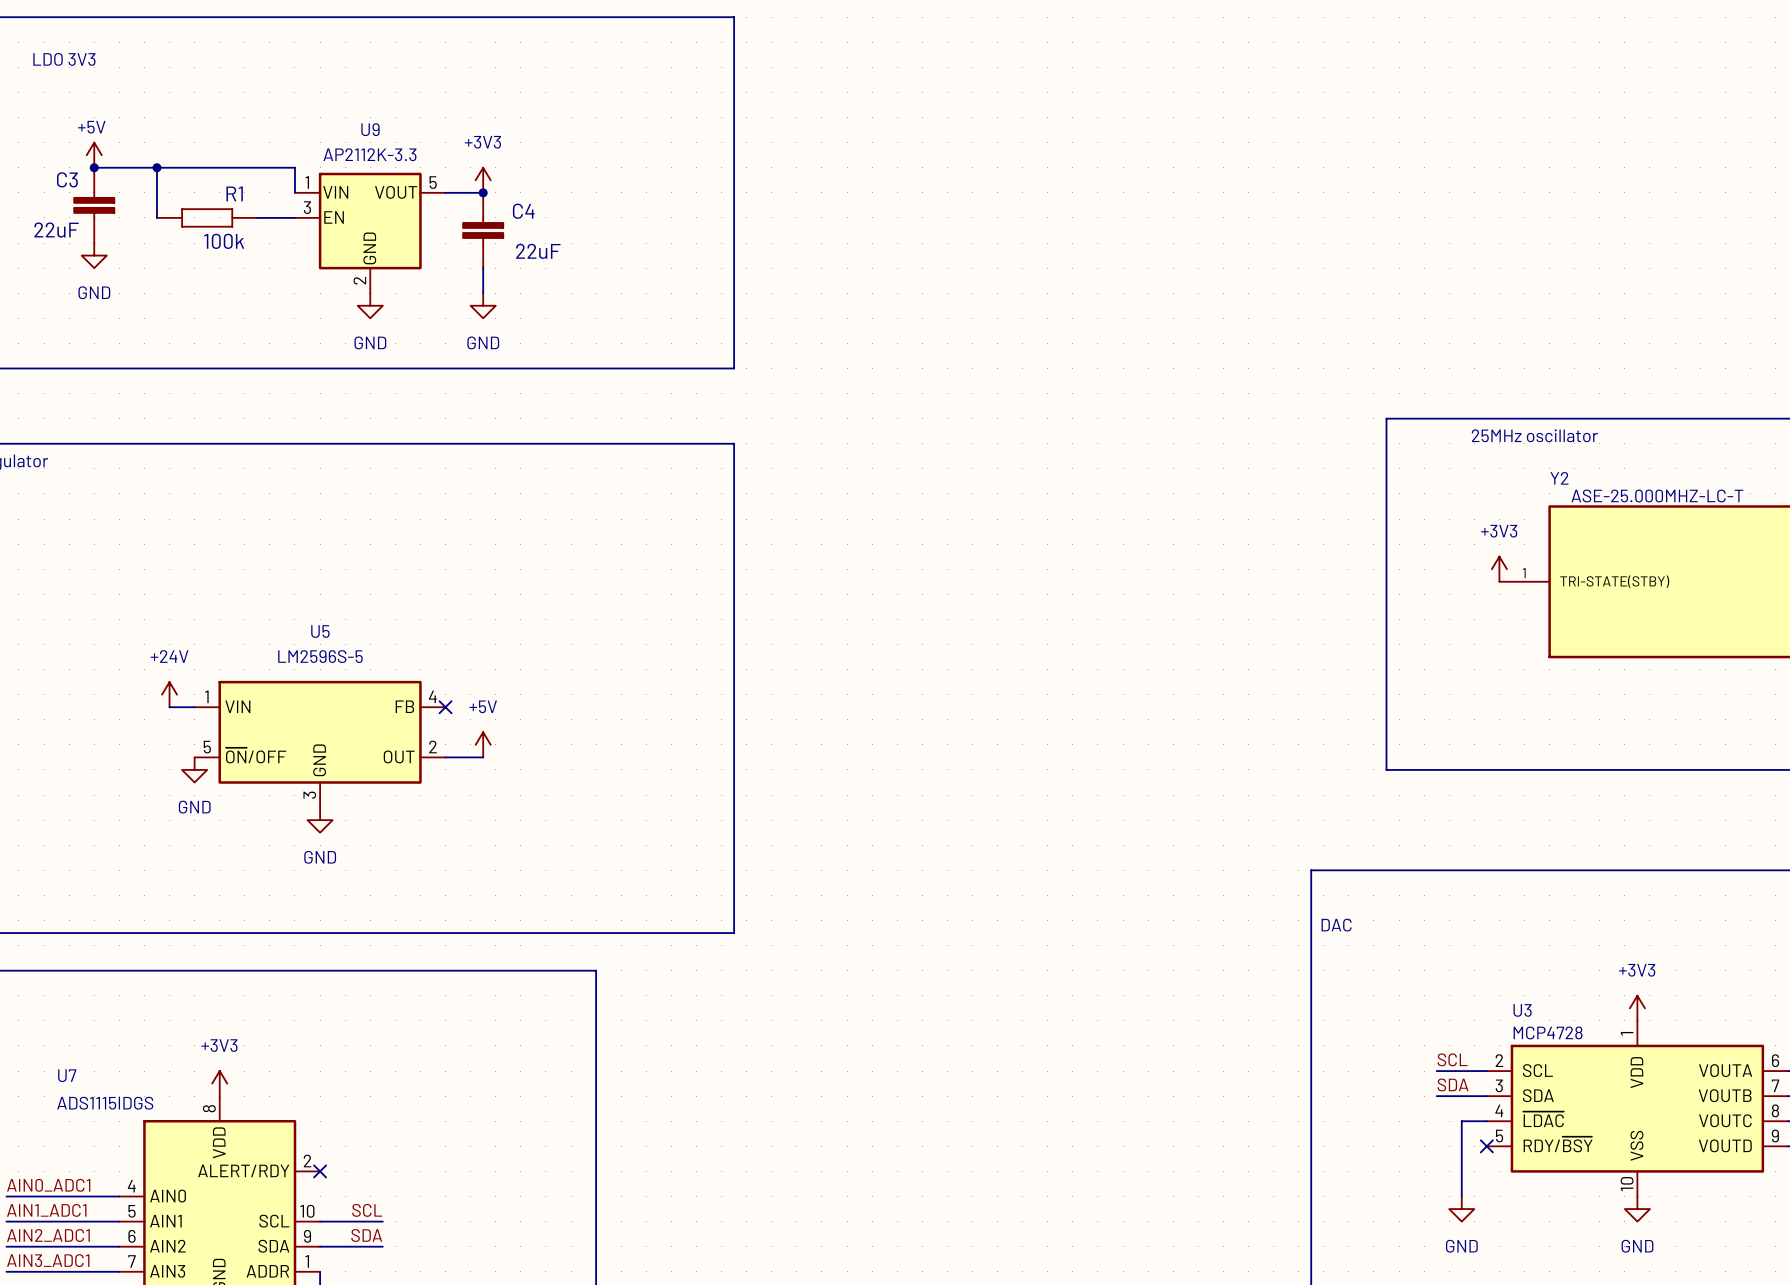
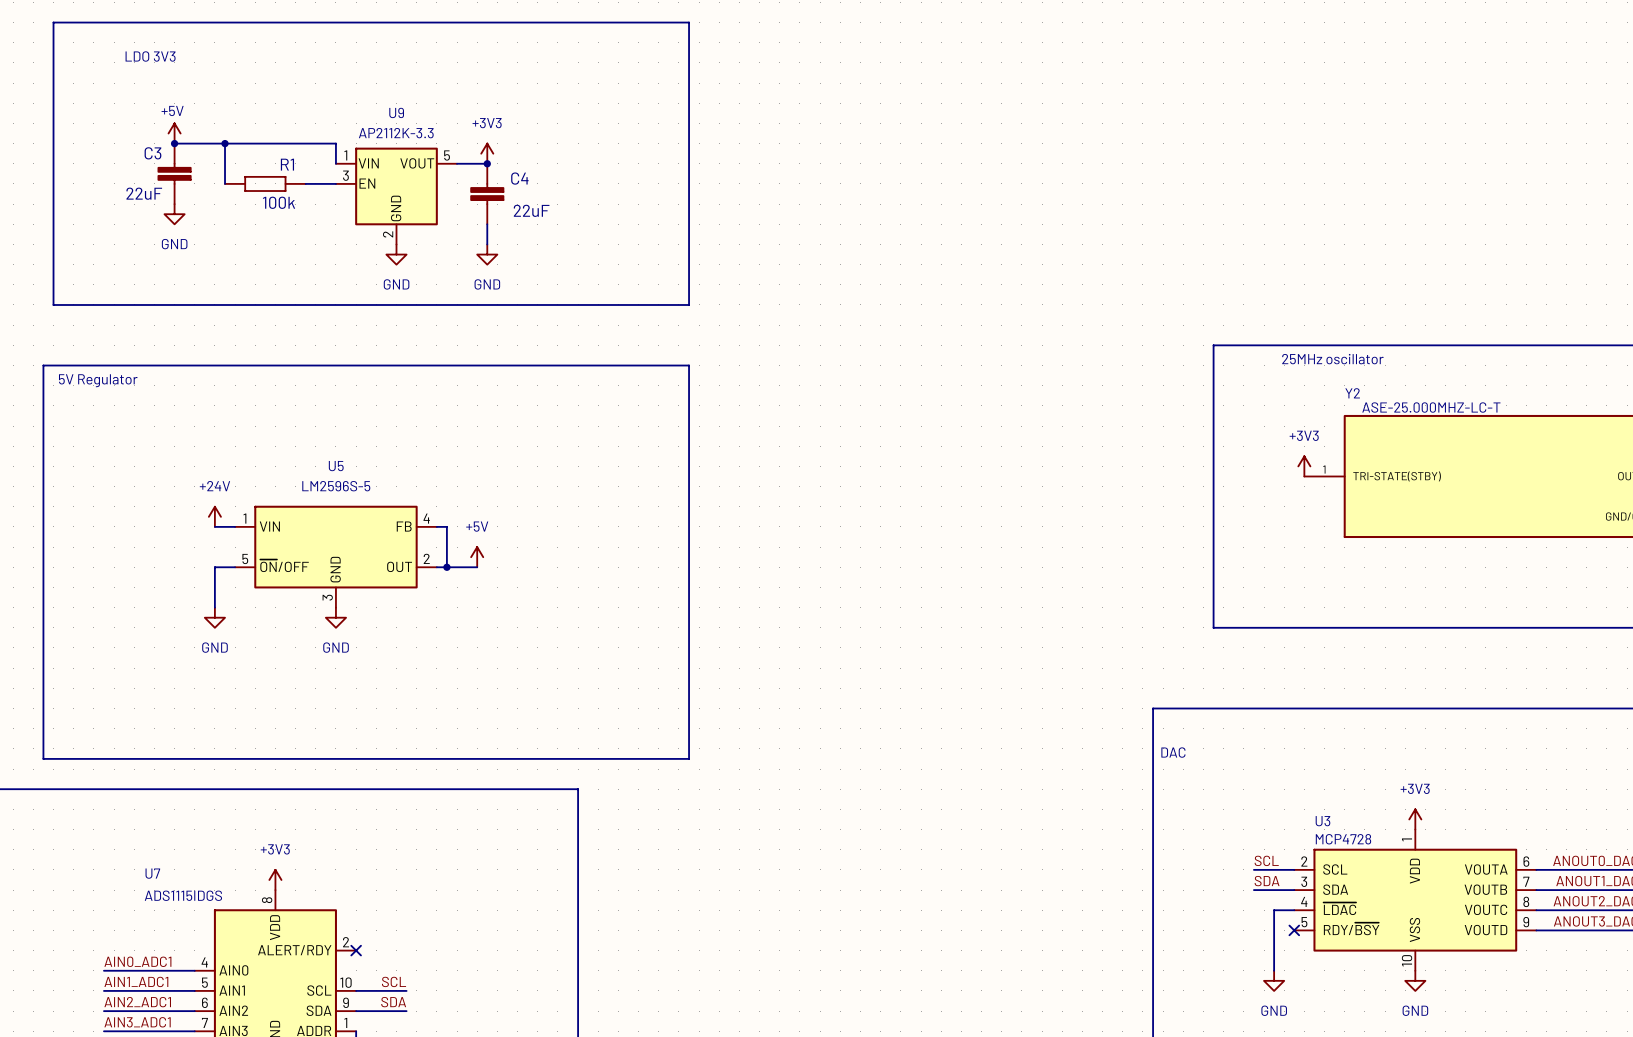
wire: none -> (436, 526) (446, 526) (446, 567)
wire: none -> (235, 567) (214, 567) (214, 607)
power symbol position: +24V (169, 694) -> +24V (214, 516)
wire: none -> (436, 567) (477, 567)
junction: none -> (446, 567)
wire: (169, 707) (194, 707) -> (214, 526) (235, 526)
no-connect mark: (445, 707) -> none
U5 position: (320, 744) -> (335, 556)
power symbol position: +5V (483, 744) -> +5V (477, 557)
power symbol: none -> GND (214, 617)
power symbol: none -> GND (335, 617)
wire: (445, 757) (483, 757) -> none
power symbol: GND (194, 769) -> none
power symbol: GND (320, 820) -> none

